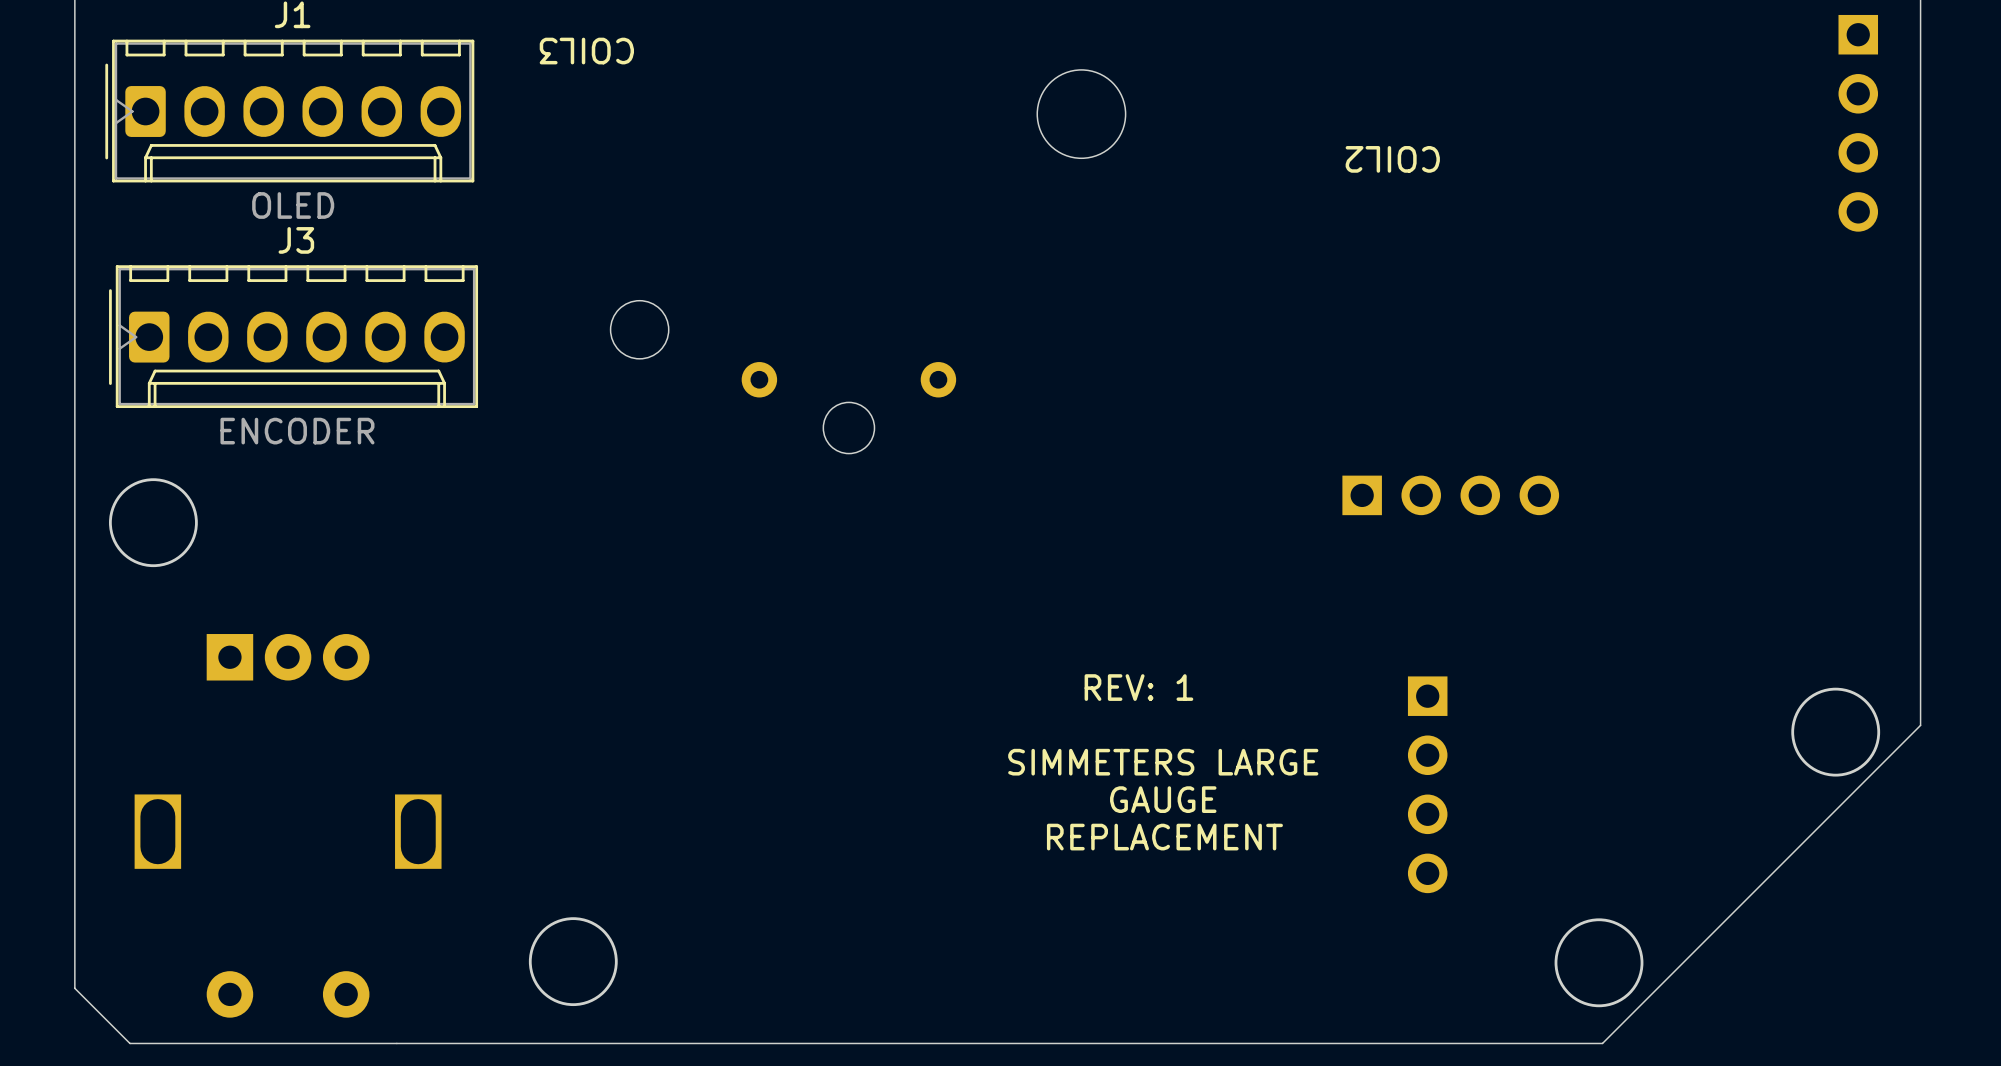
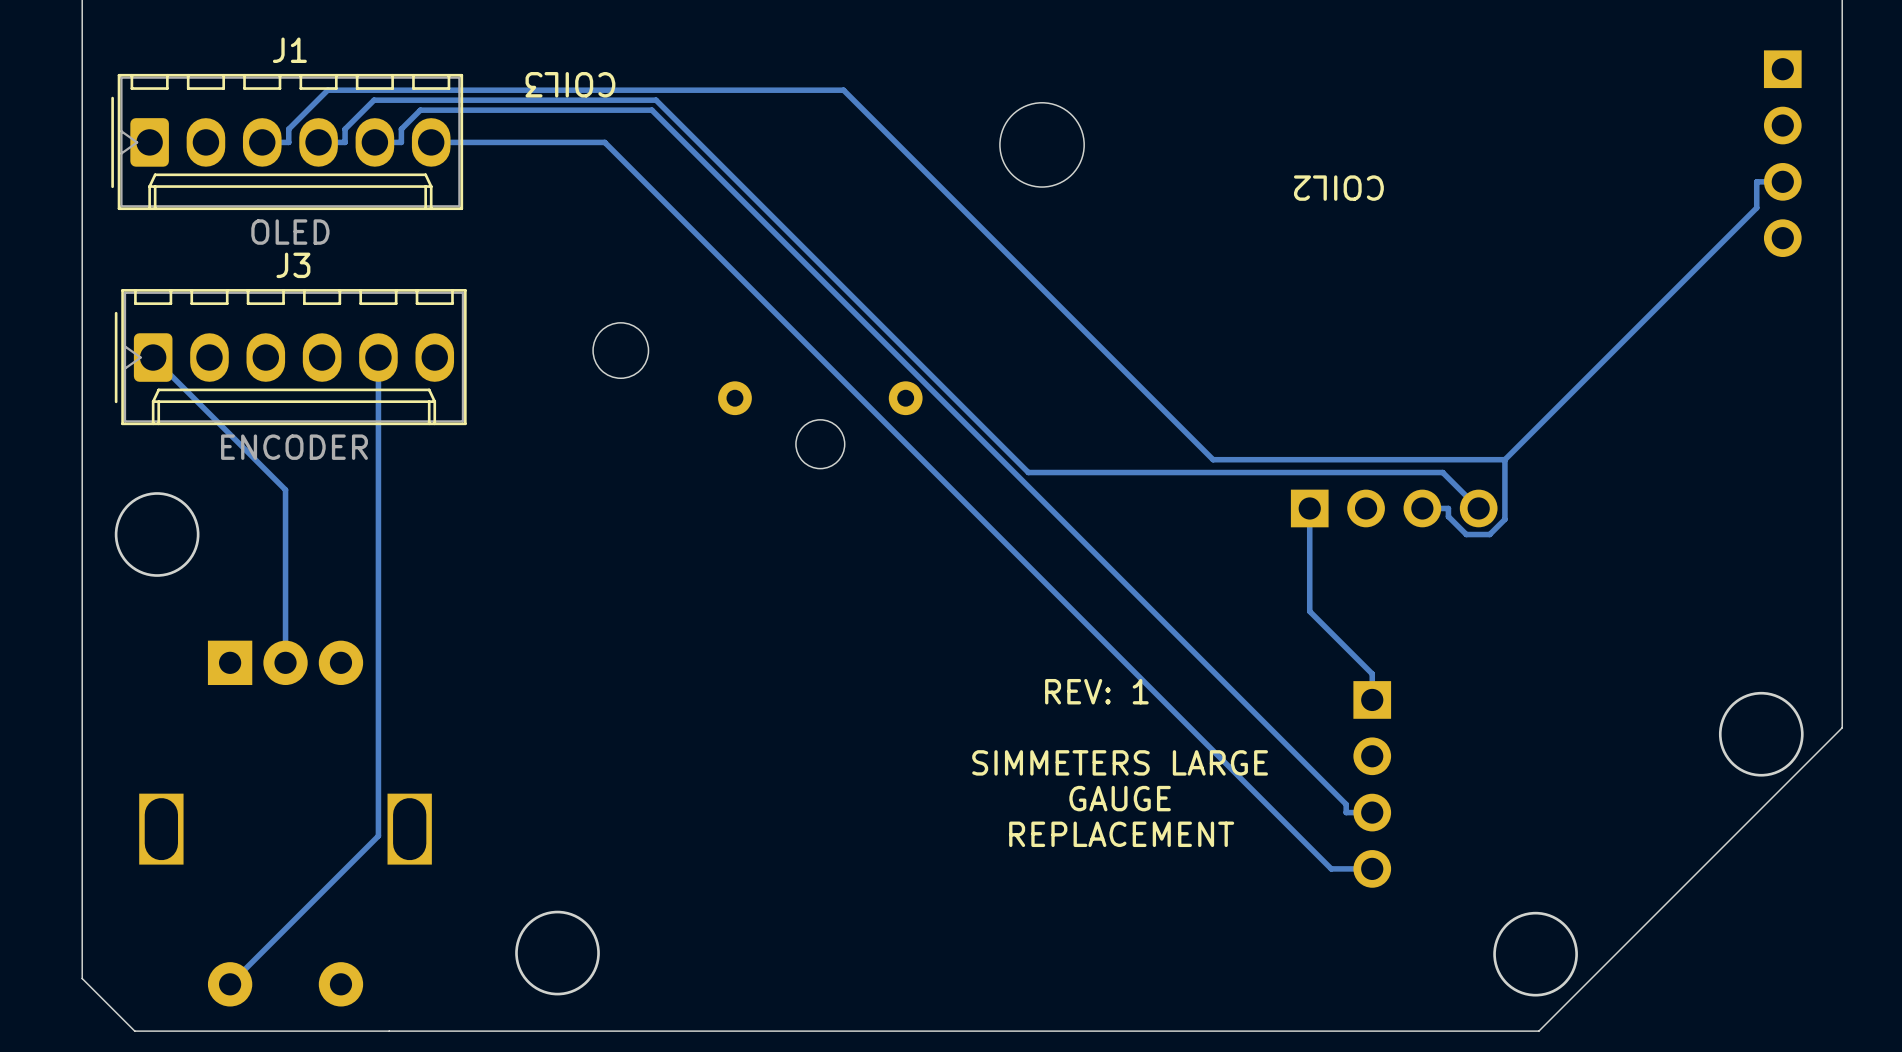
track: none -> (262, 142) (288, 142) (288, 129) (327, 90) (843, 90) (1213, 459) (1504, 459)
track: none -> (318, 142) (345, 142) (345, 129) (374, 100) (656, 100) (1028, 472) (1442, 472) (1478, 508)
track: none -> (374, 142) (401, 142) (401, 129) (420, 110) (651, 110) (1346, 804) (1346, 812) (1372, 812)
track: none -> (431, 142) (604, 142) (1331, 868) (1372, 868)
track: none -> (1782, 181) (1756, 181) (1756, 207) (1504, 459)
track: none -> (153, 357) (285, 489) (285, 662)
track: none -> (378, 357) (378, 836) (230, 984)
track: none -> (1504, 459) (1504, 519) (1489, 534) (1466, 534) (1448, 516) (1448, 508) (1422, 508)
track: none -> (1309, 508) (1309, 611) (1372, 673) (1372, 699)

